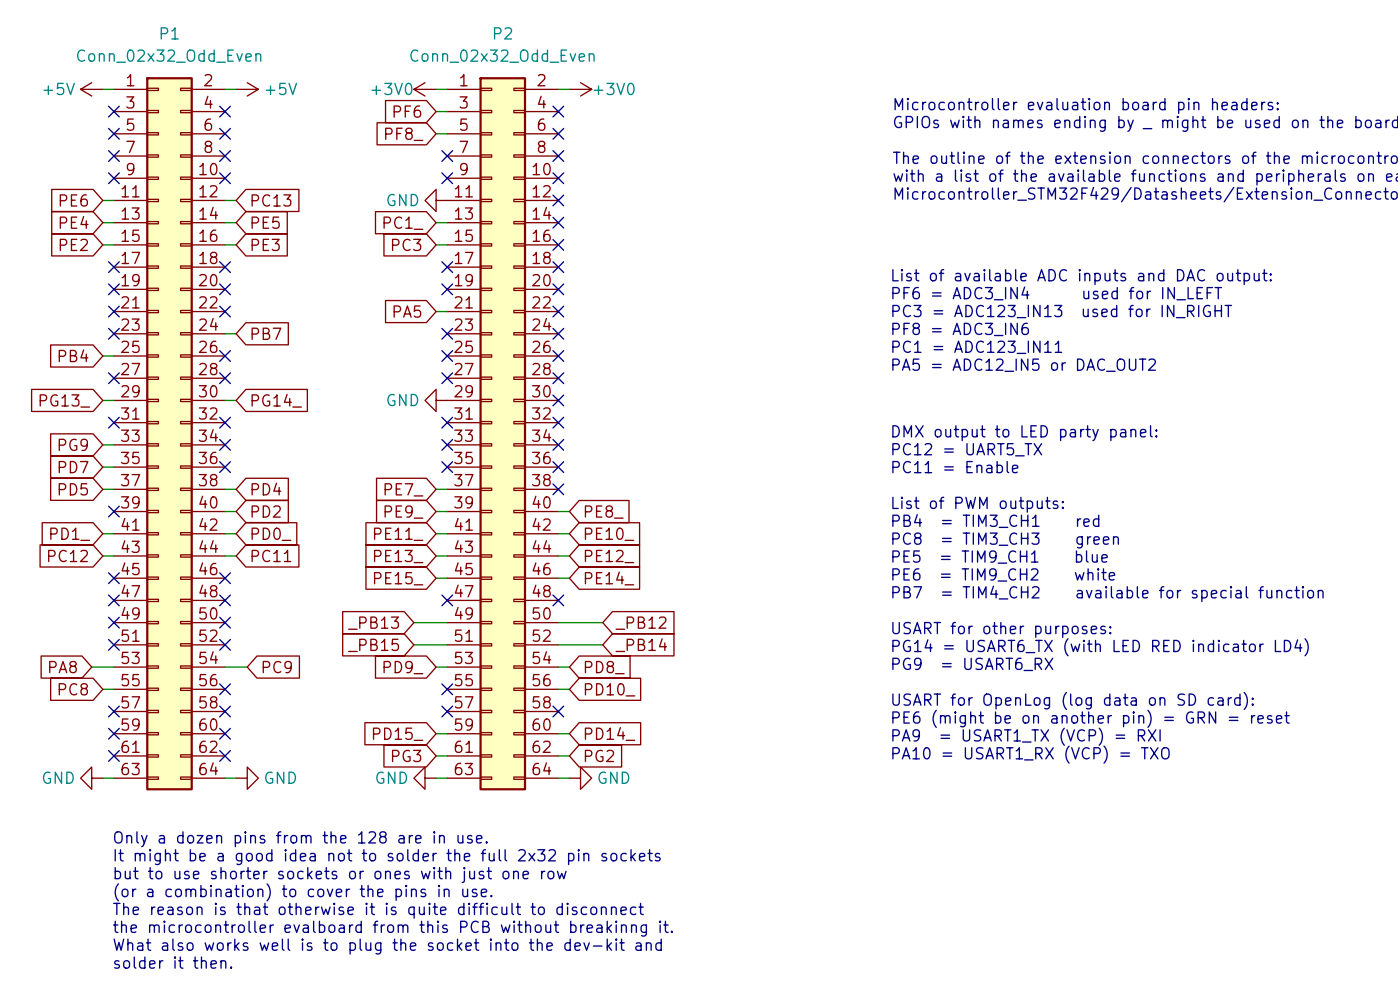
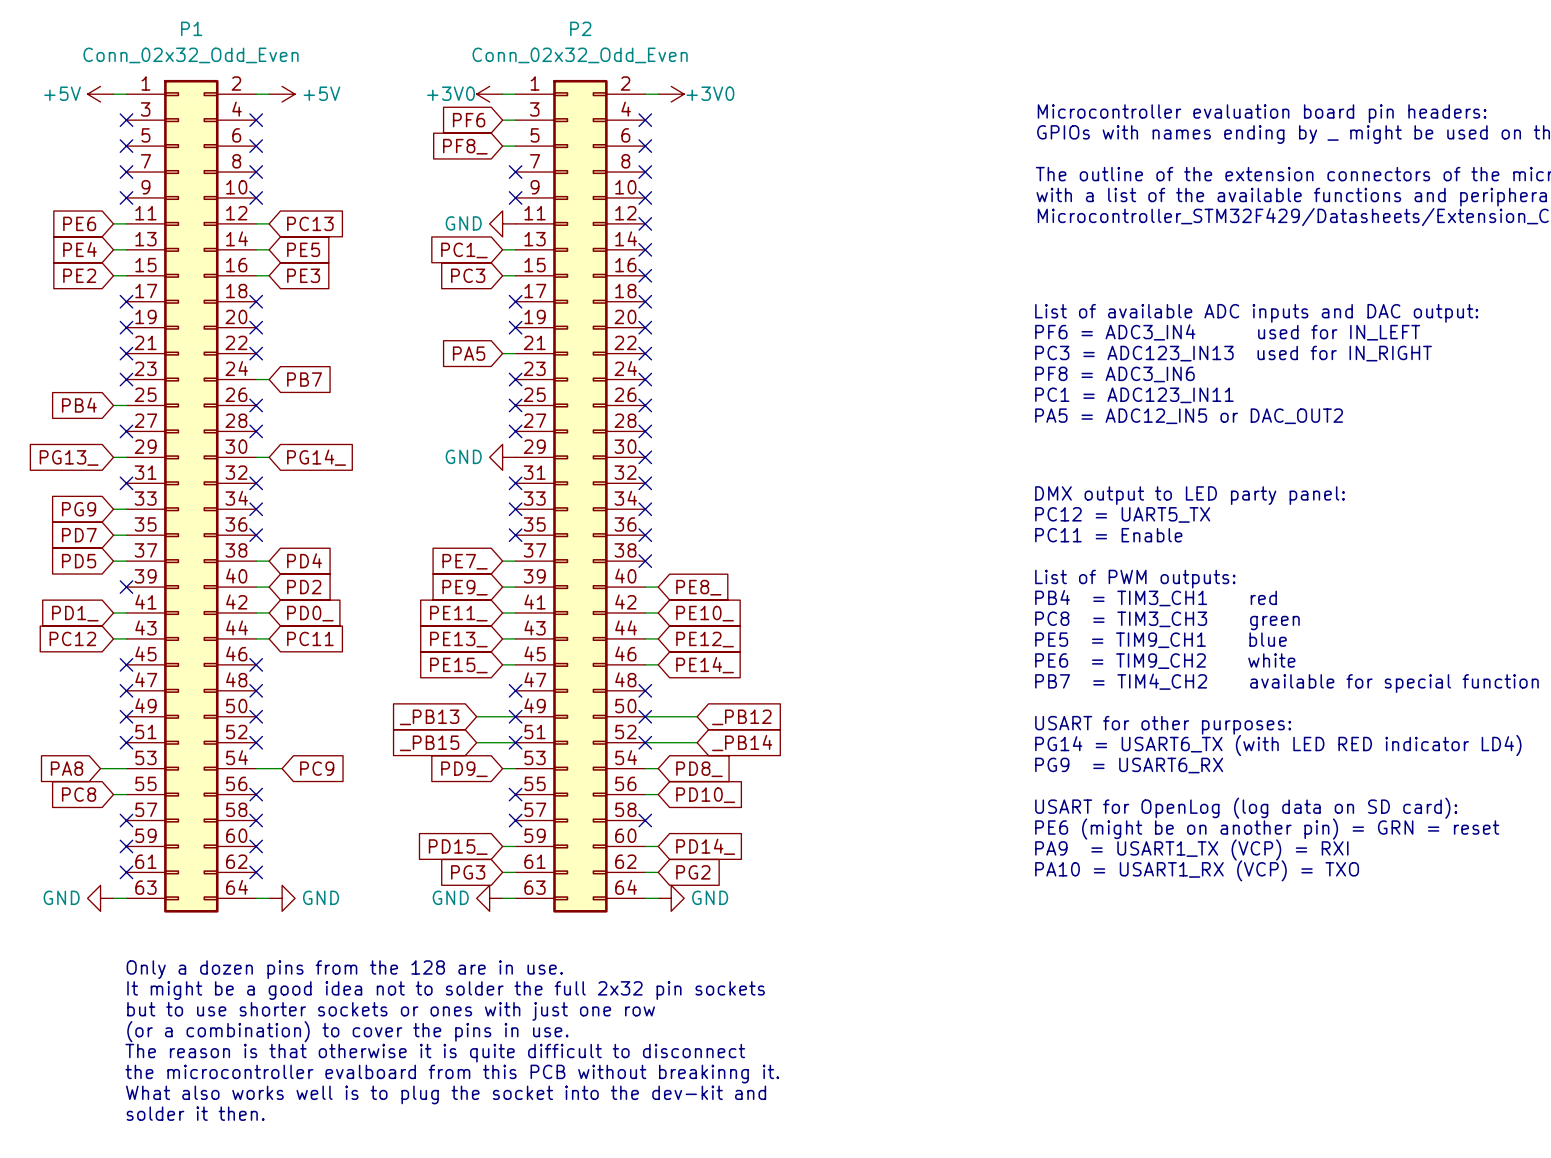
no-connect mark: none -> (515, 716)
no-connect mark: none -> (645, 716)
no-connect mark: none -> (515, 742)
no-connect mark: none -> (645, 742)

